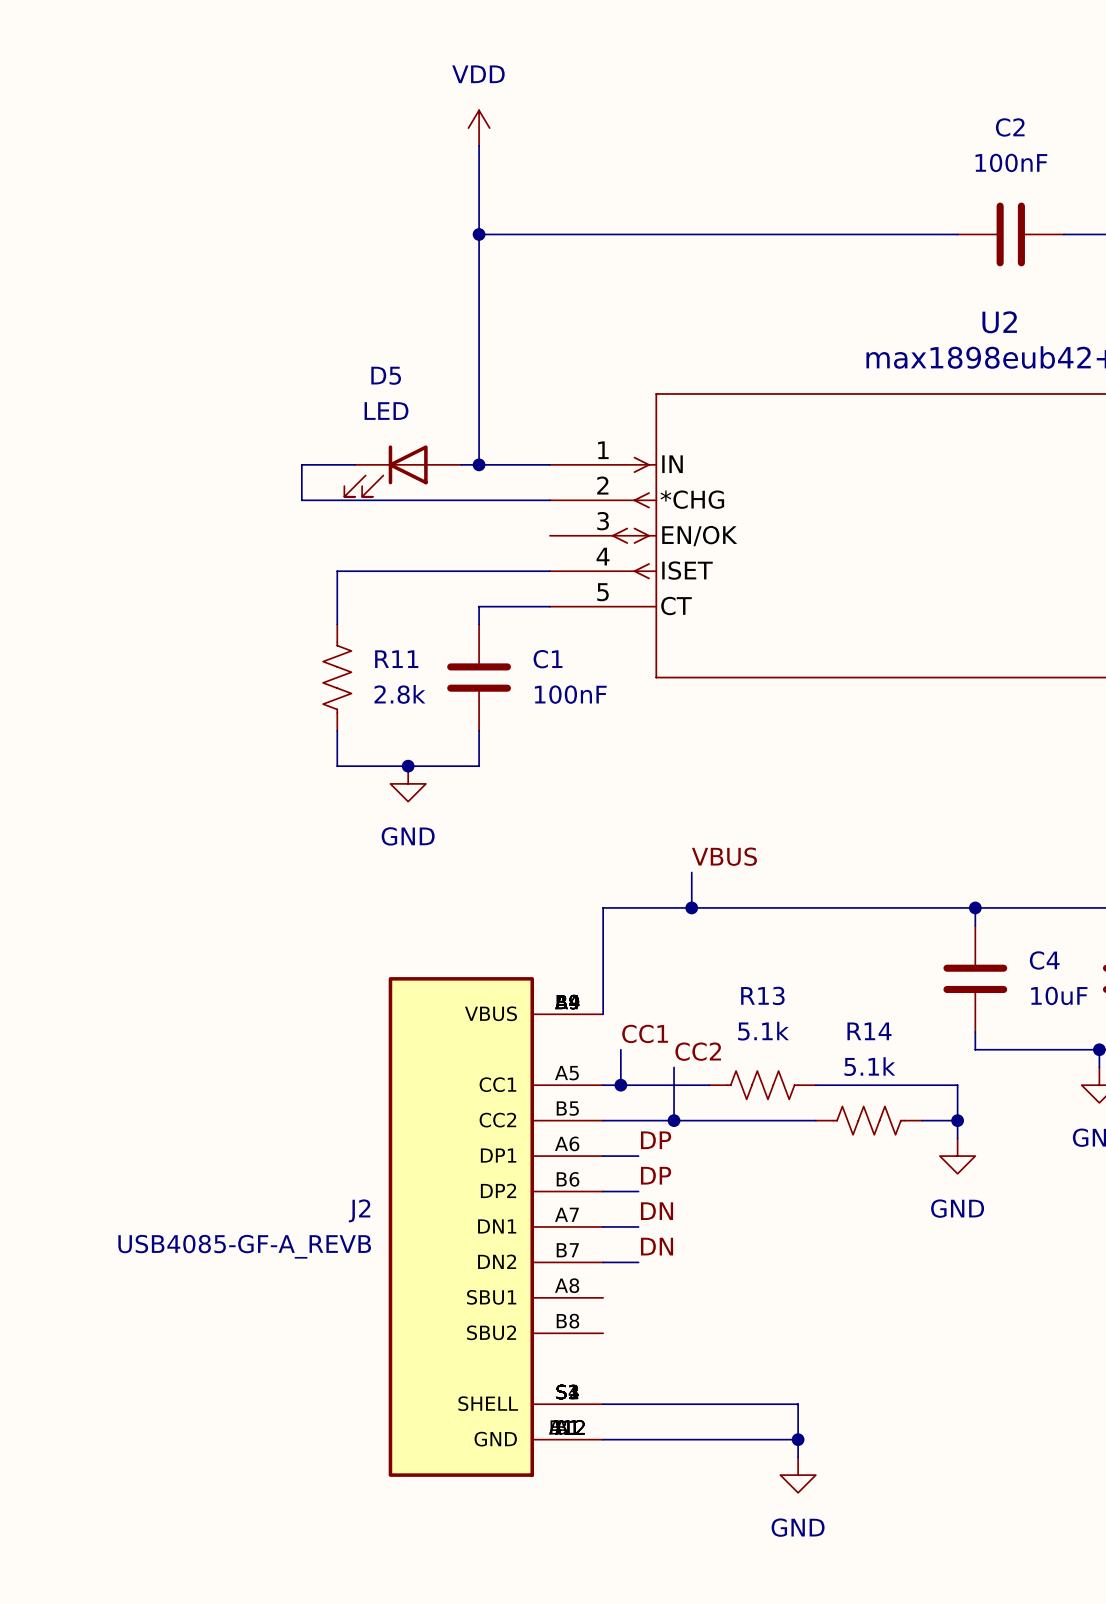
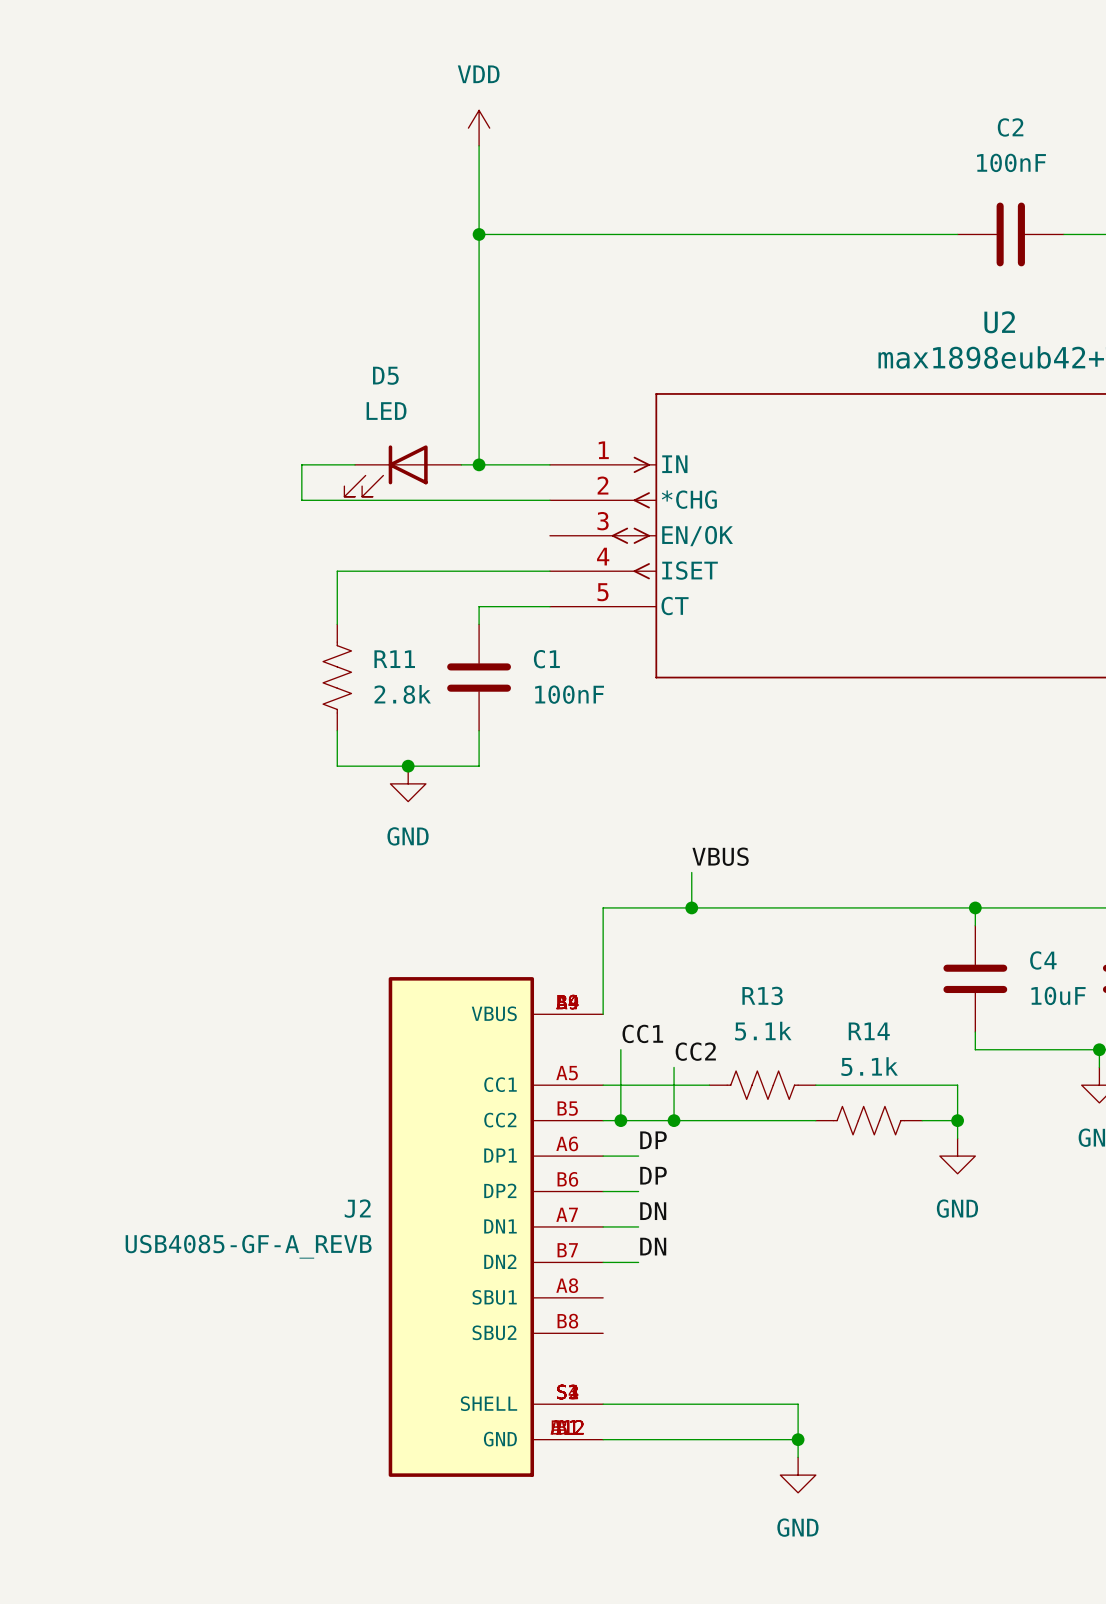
wire: none -> (620, 1085) (620, 1120)
junction position: (620, 1085) -> (620, 1120)

